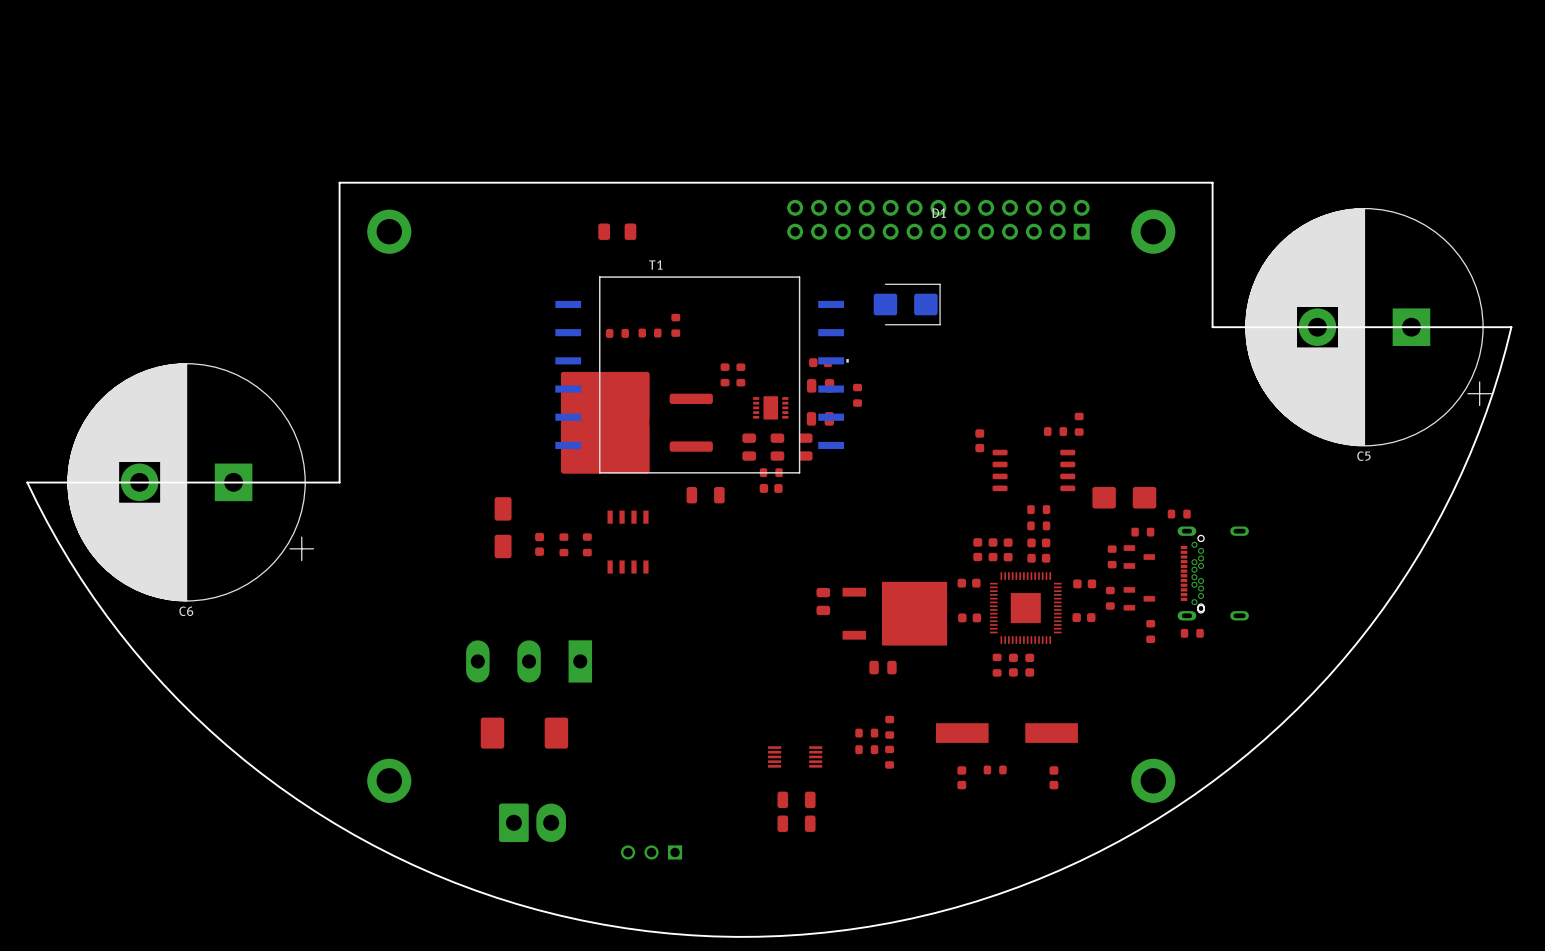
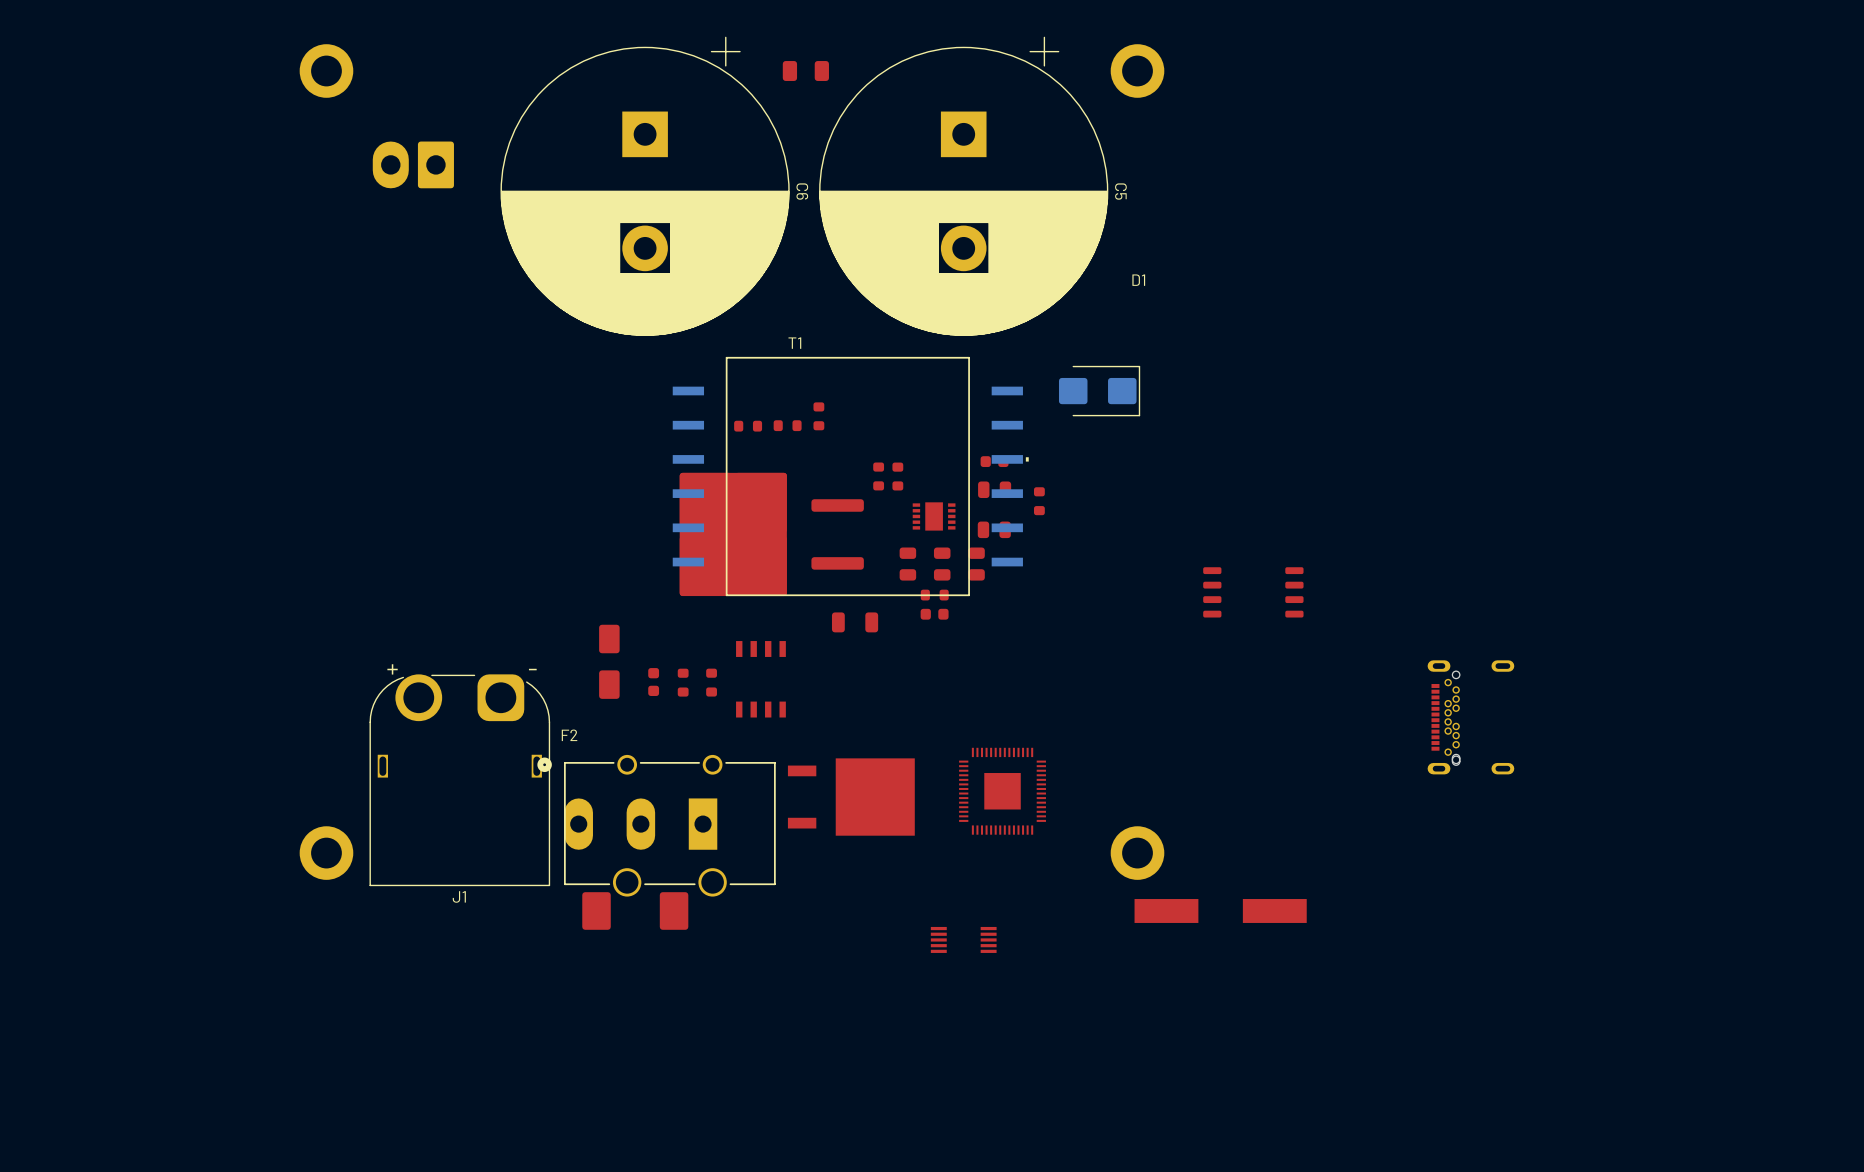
part: none -> (1137, 71)
part: none -> (413, 164)
board edge: (1212, 182) (1212, 327) (1511, 327) (1500, 370) (1478, 433) (1451, 494) (1431, 533) (1383, 608) (1327, 677) (1264, 739) (1194, 794) (1119, 841) (1039, 879) (997, 894) (933, 913) (868, 926) (802, 934) (735, 936) (669, 933) (603, 924) (538, 910) (475, 890) (413, 865) (354, 834) (297, 799) (244, 759) (194, 715) (148, 667) (106, 615) (69, 560) (27, 482) (339, 482) (339, 182) (1212, 182) -> none
part: (938, 219) -> none
part position: (389, 231) -> (326, 71)
part position: (617, 231) -> (805, 71)
part: (1153, 231) -> none
C5 rotation: 0° (1368, 327) -> 90° counterclockwise (963, 186)
C5 position: (1368, 327) -> (963, 186)
part: (1079, 424) -> none
part: (1055, 431) -> none
part: (979, 440) -> none
C6 rotation: 0° (190, 482) -> 90° counterclockwise (645, 186)
C6 position: (190, 482) -> (645, 186)
part: (1124, 497) -> none
part: (1038, 509) -> none
part: (1179, 514) -> none
part: (1038, 525) -> none
part: (1142, 532) -> none
part: (1038, 542) -> none
part: (977, 549) -> none
part: (993, 549) -> none
part: (1008, 549) -> none
part: (1112, 556) -> none
part: (1139, 557) -> none
part: (1038, 558) -> none
part: (969, 583) -> none
part: (1084, 583) -> none
part: (1110, 598) -> none
part: (1139, 598) -> none
part: (823, 601) -> none
part position: (1025, 608) -> (1002, 791)
part position: (894, 613) -> (851, 797)
part: (969, 617) -> none
part: (1083, 617) -> none
J1: none -> (459, 780)
part: (1150, 631) -> none
part: (1192, 633) -> none
F2: none -> (656, 825)
part: (997, 665) -> none
part: (1013, 665) -> none
part: (1029, 665) -> none
part: (883, 667) -> none
part: none -> (1137, 853)
part: (889, 727) -> none
part: (866, 733) -> none
part: (866, 749) -> none
part: (889, 757) -> none
part: (995, 769) -> none
part: (961, 777) -> none
part: (1053, 777) -> none
part position: (389, 780) -> (326, 853)
part: (1153, 780) -> none
part: (796, 799) -> none
part: (532, 822) -> none
part: (796, 823) -> none
part: (651, 852) -> none

